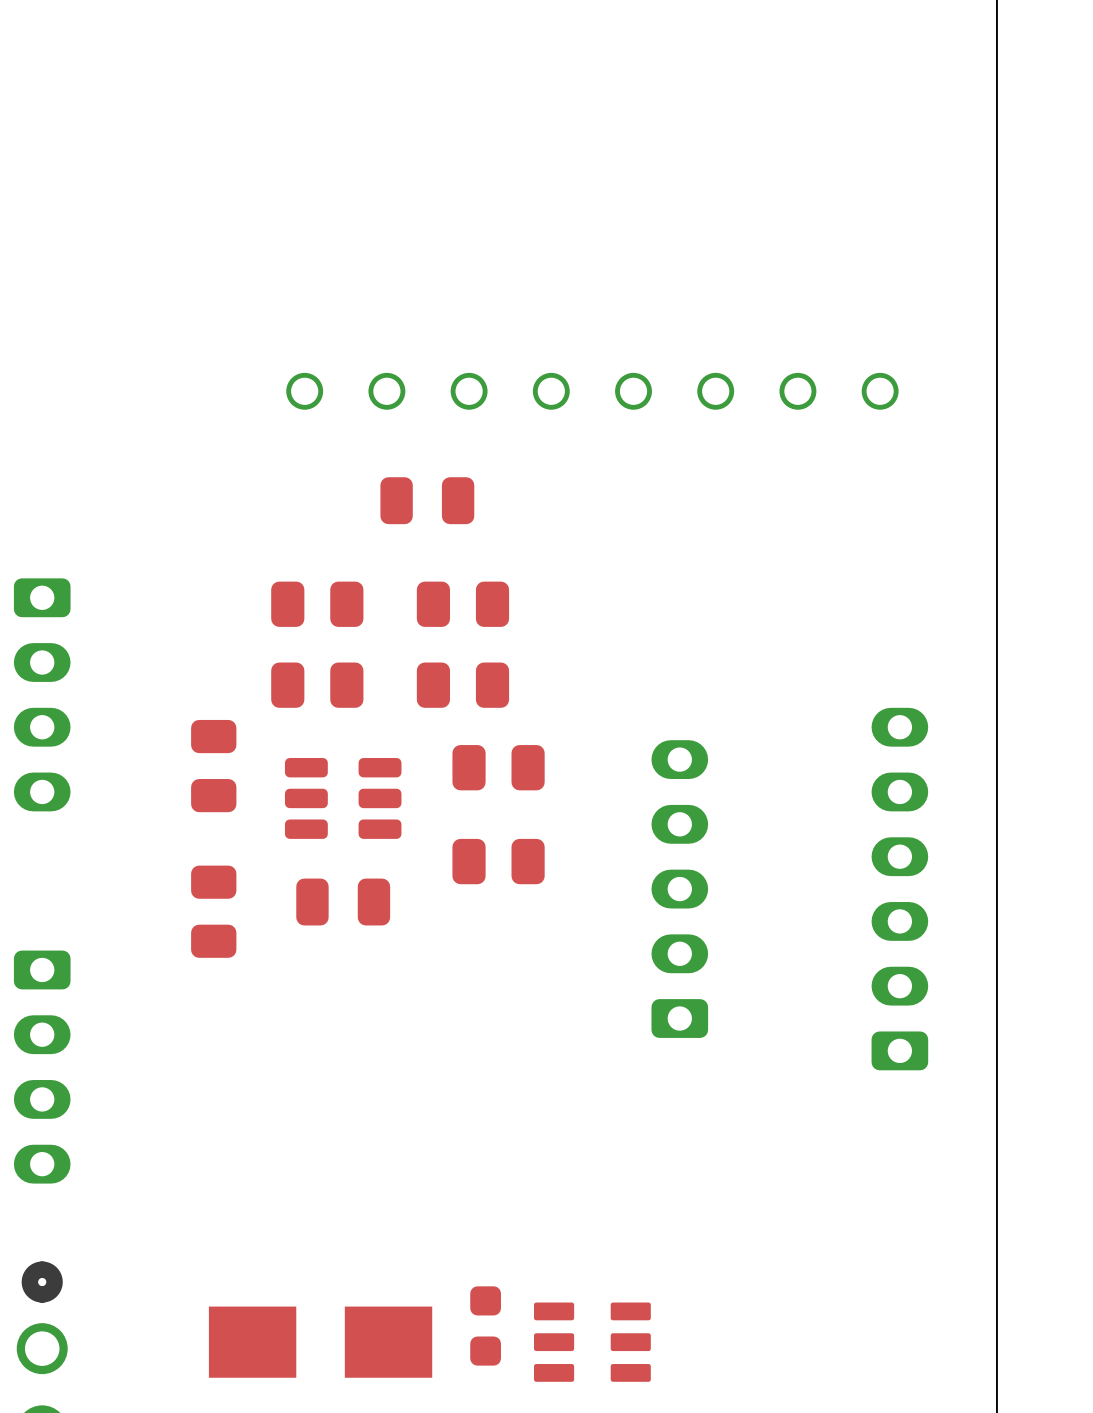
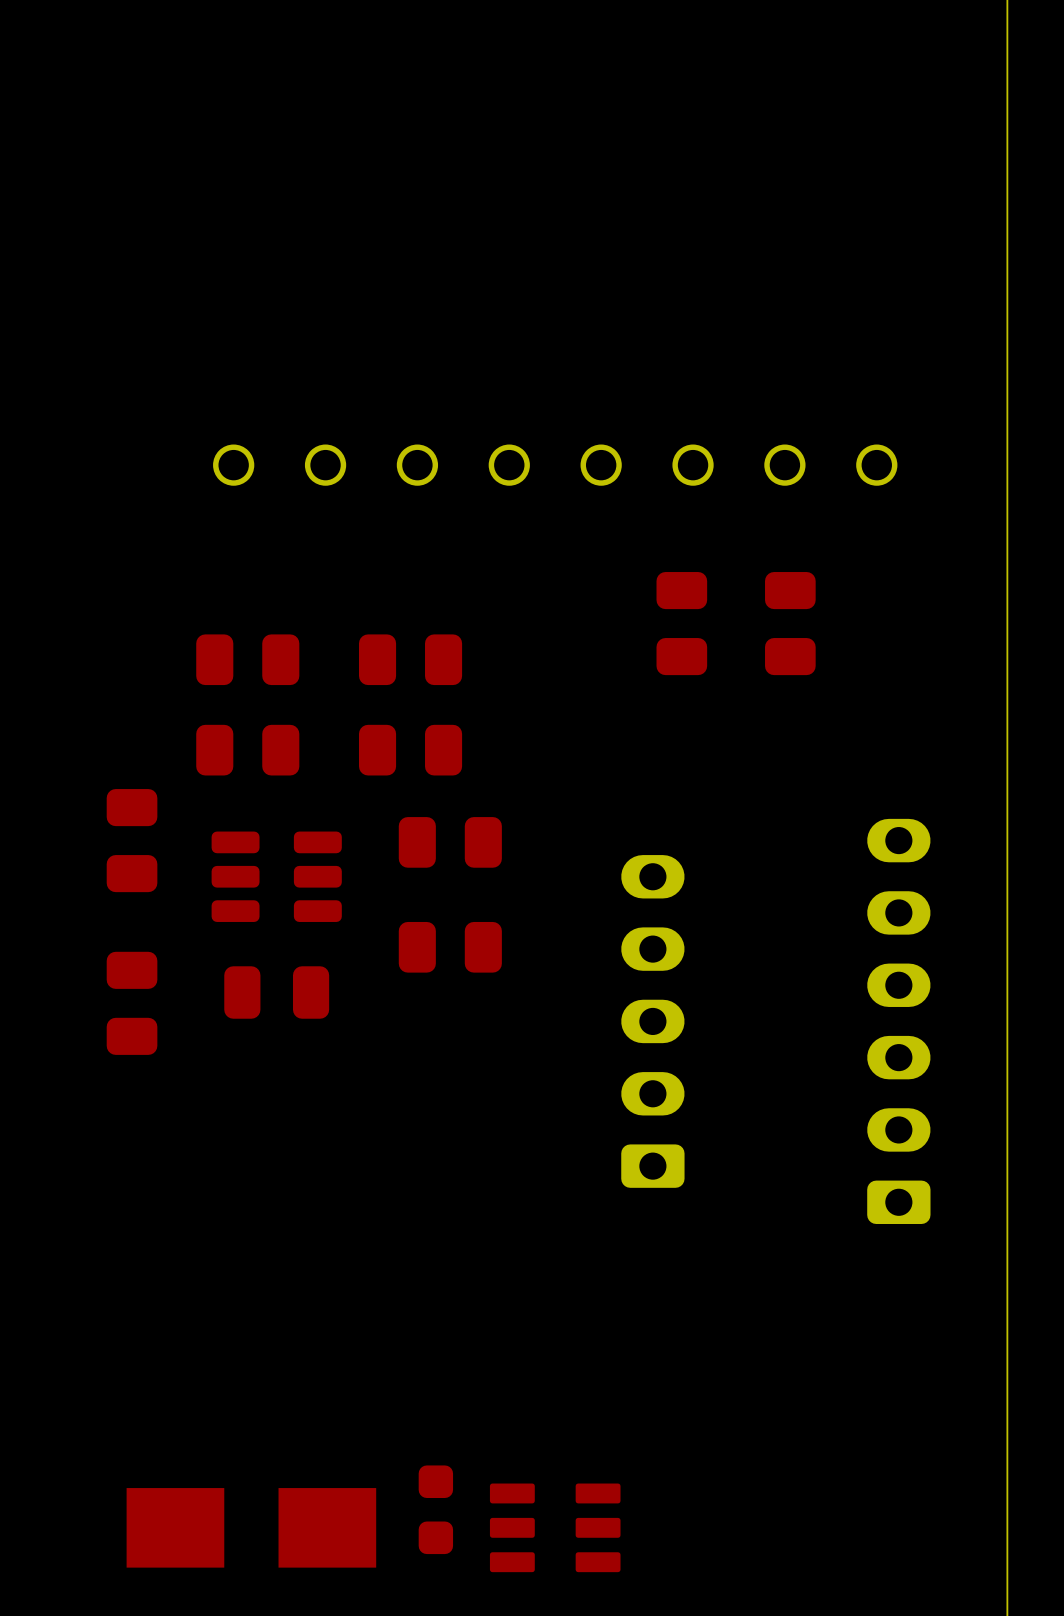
part: (427, 500) -> none
part: none -> (681, 623)
part: none -> (790, 623)
part: none -> (247, 659)
part: none -> (410, 659)
part: (317, 604) -> none
part: (462, 604) -> none
part: none -> (247, 750)
part: none -> (410, 750)
part: (317, 685) -> none
part: (462, 685) -> none
part: none -> (450, 842)
part position: (213, 766) -> (132, 840)
part: (498, 767) -> none
part position: (343, 798) -> (276, 876)
part: none -> (450, 947)
part: (498, 861) -> none
part position: (343, 902) -> (276, 992)
part position: (213, 911) -> (132, 1003)

